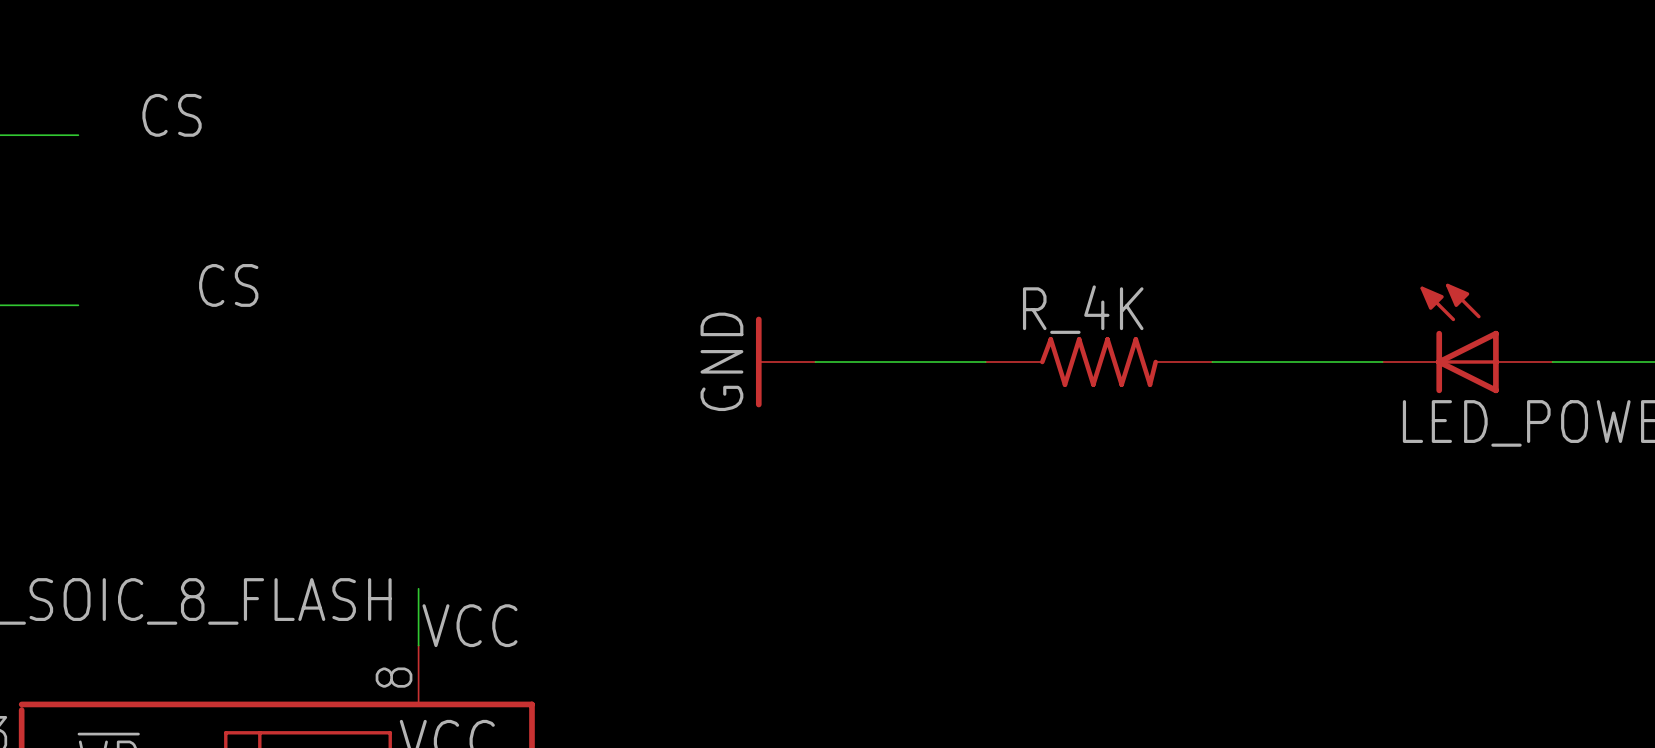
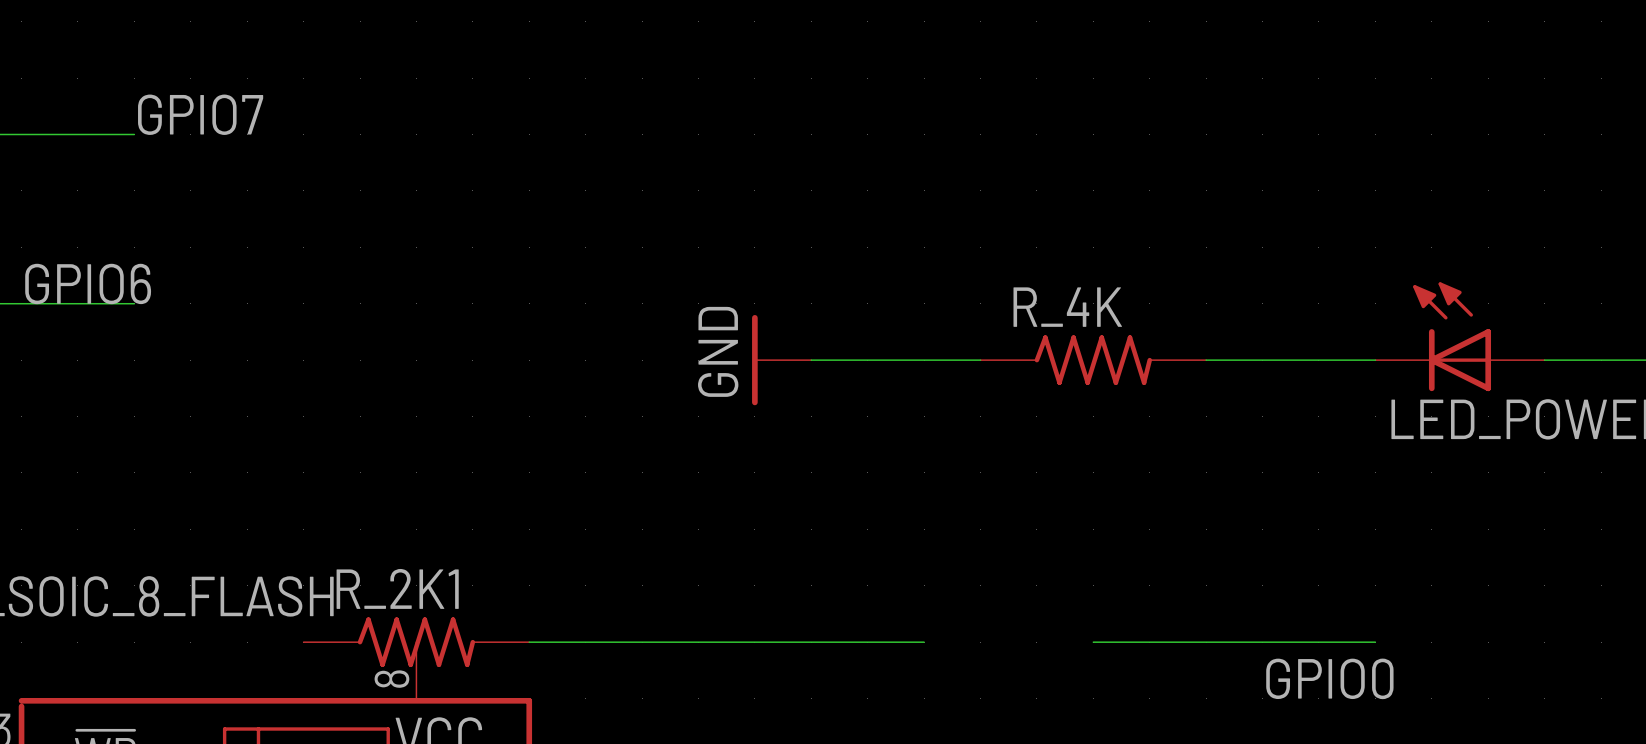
label: CS (172, 115) -> GPIO7 (200, 114)
wire: none -> (77, 134) (134, 134)
label: none -> GPIO6 (88, 283)
label: CS (228, 285) -> none
wire: none -> (77, 303) (134, 303)
wire: (418, 588) (418, 645) -> none
label: VCC (470, 625) -> none
R_2K1: none -> (416, 642)
wire: none -> (529, 642) (924, 642)
wire: none -> (1093, 642) (1375, 642)
label: none -> GPIO0 (1329, 678)

